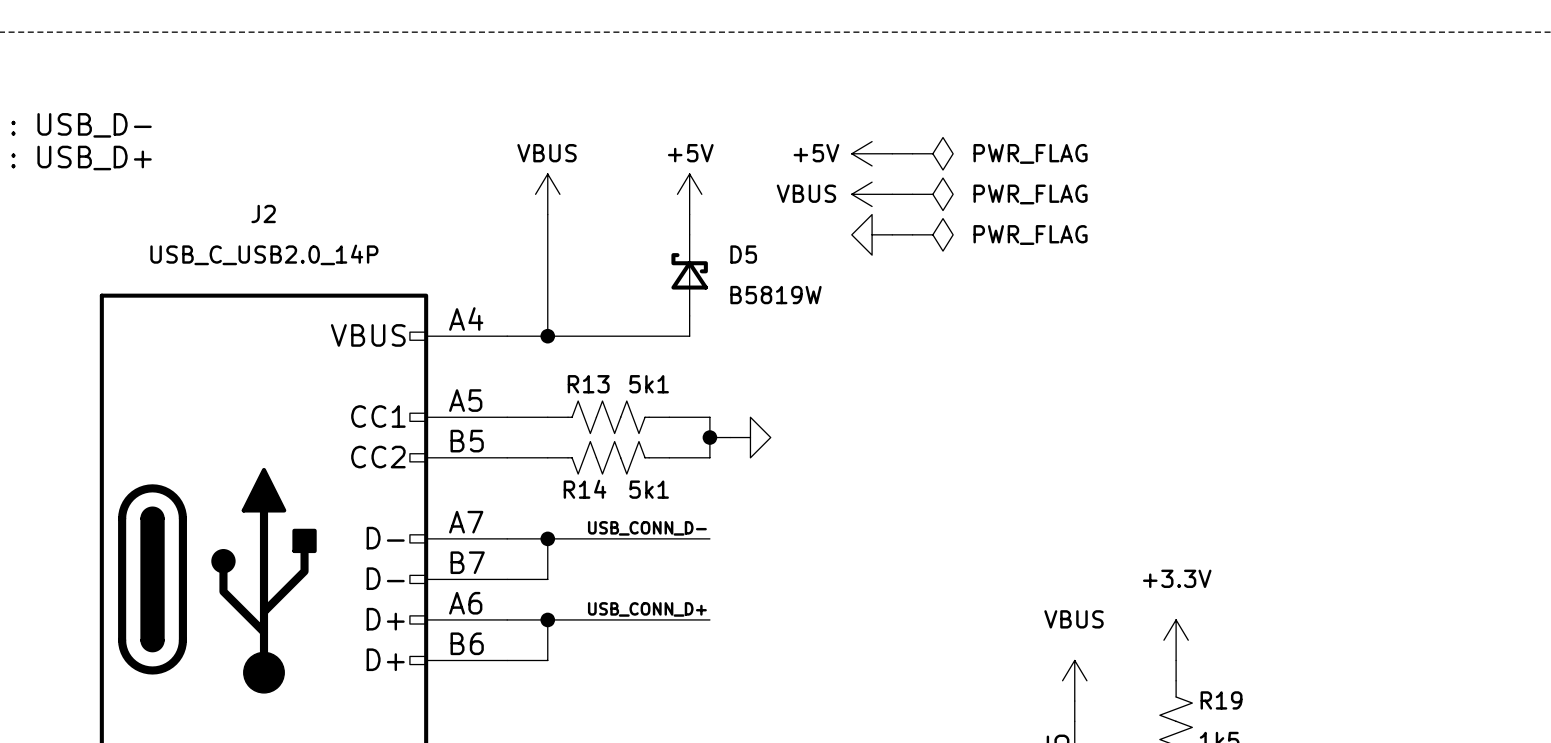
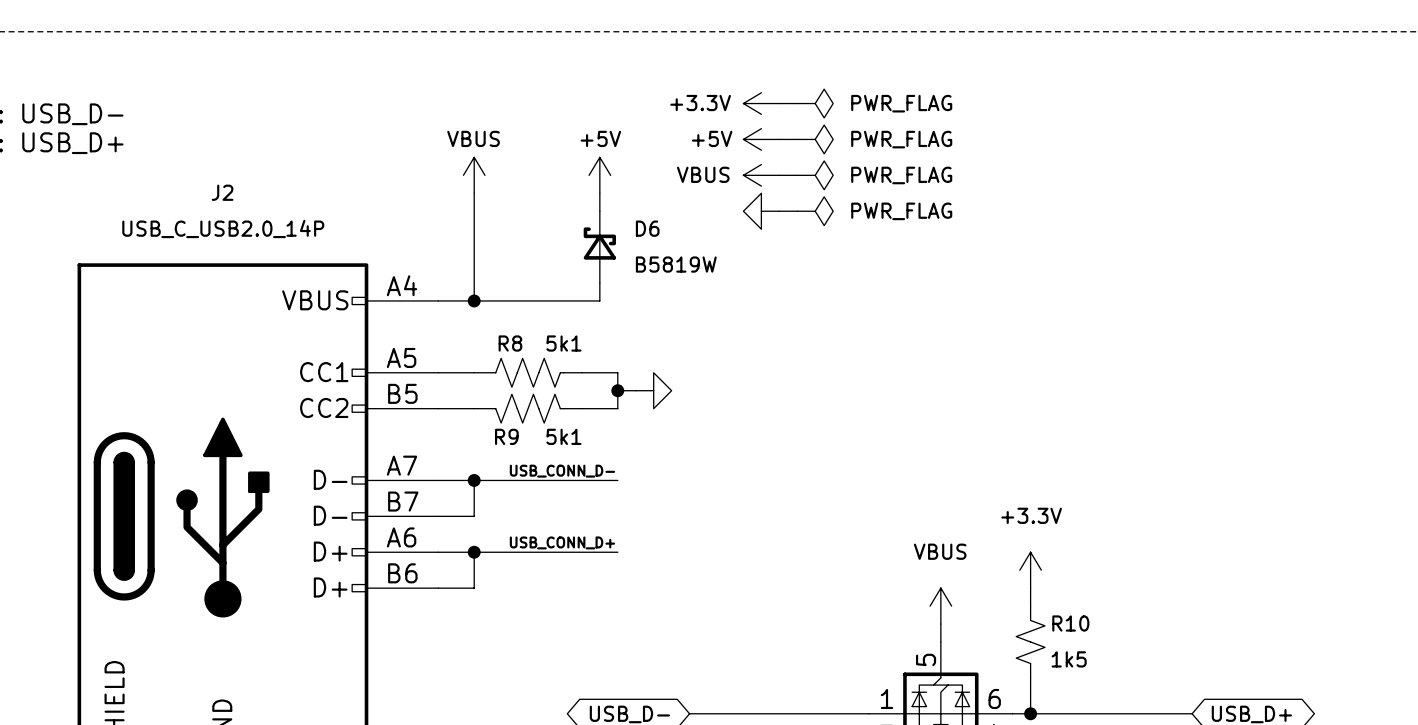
power symbol: none -> +3.3V (761, 103)
wire: none -> (779, 103) (797, 103)
power symbol: none -> PWR_FLAG (815, 103)
D5 name: D5 (743, 254) -> D6 (647, 228)
R13 name: R13 (588, 384) -> R8 (510, 343)
R14 name: R14 (585, 489) -> R9 (506, 436)
R19 name: R19 (1221, 700) -> R10 (1070, 623)

